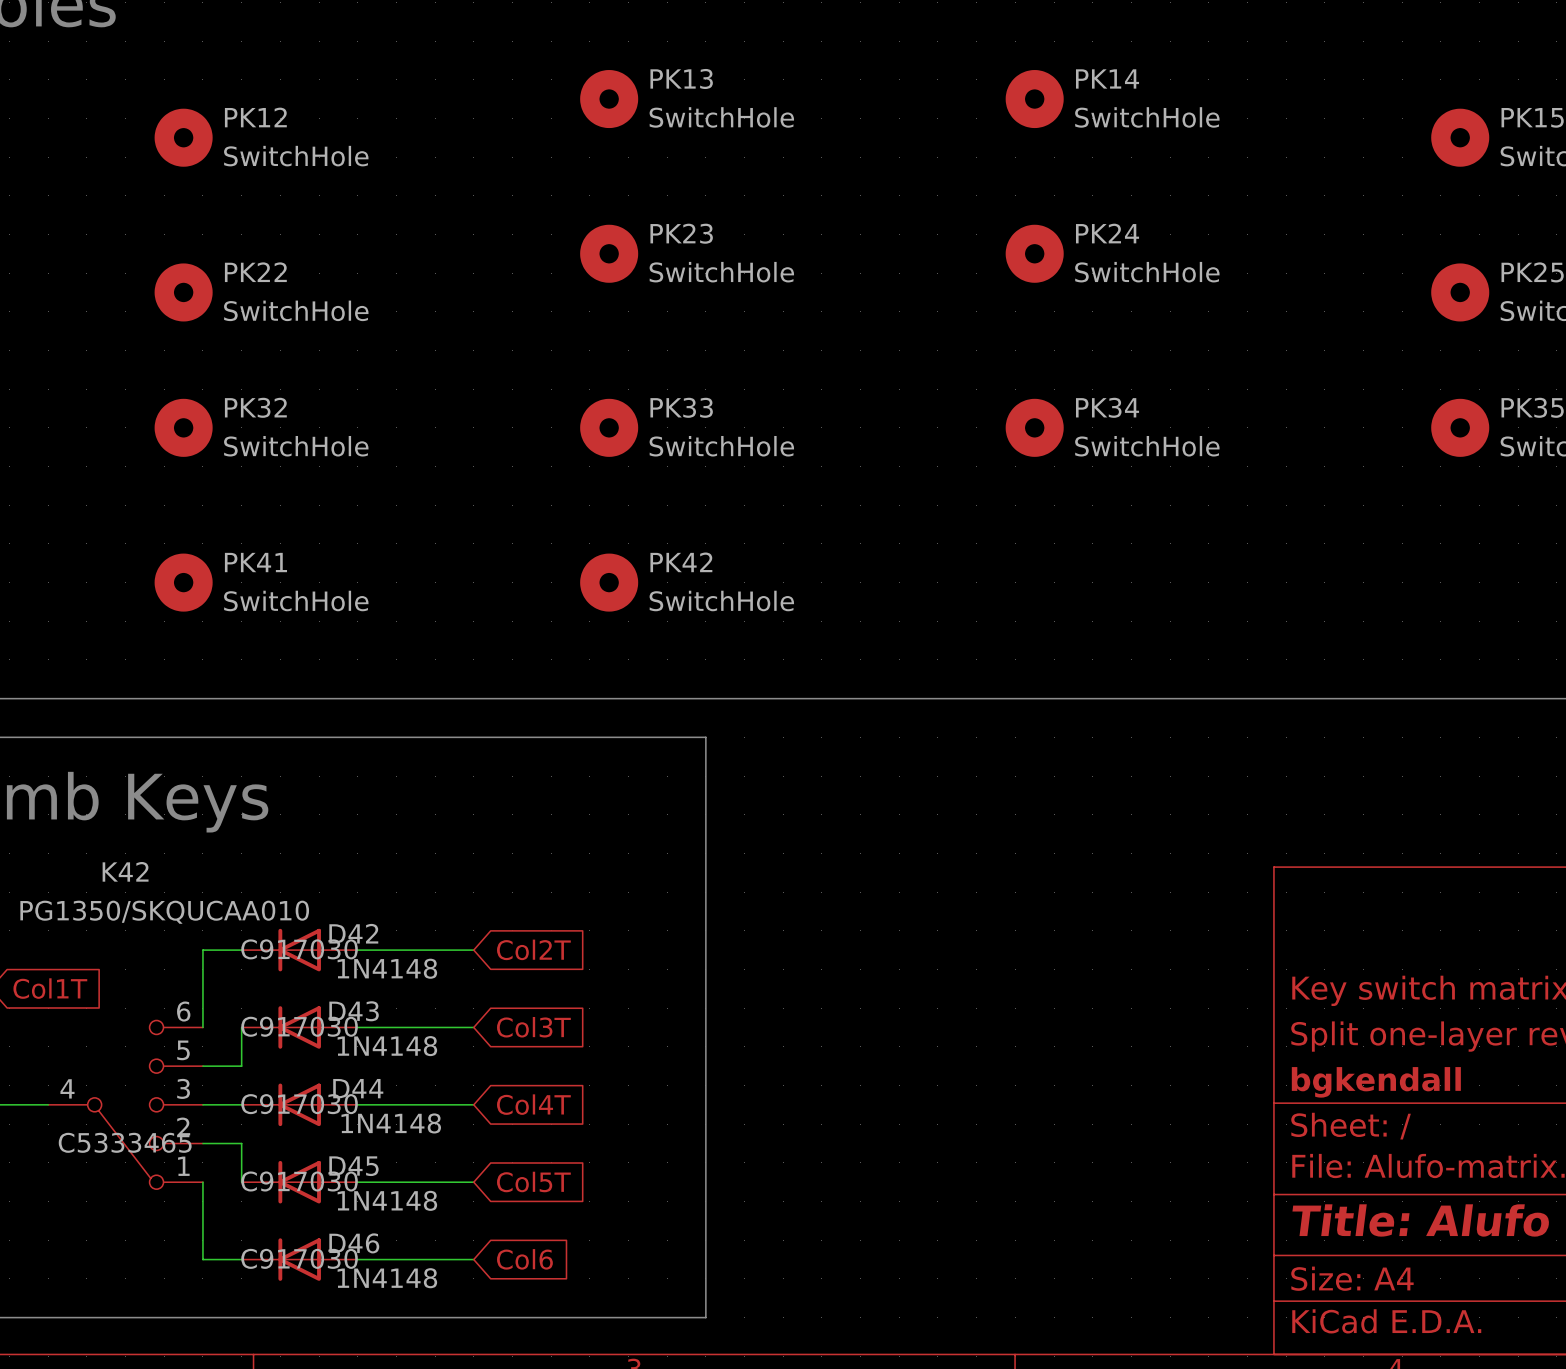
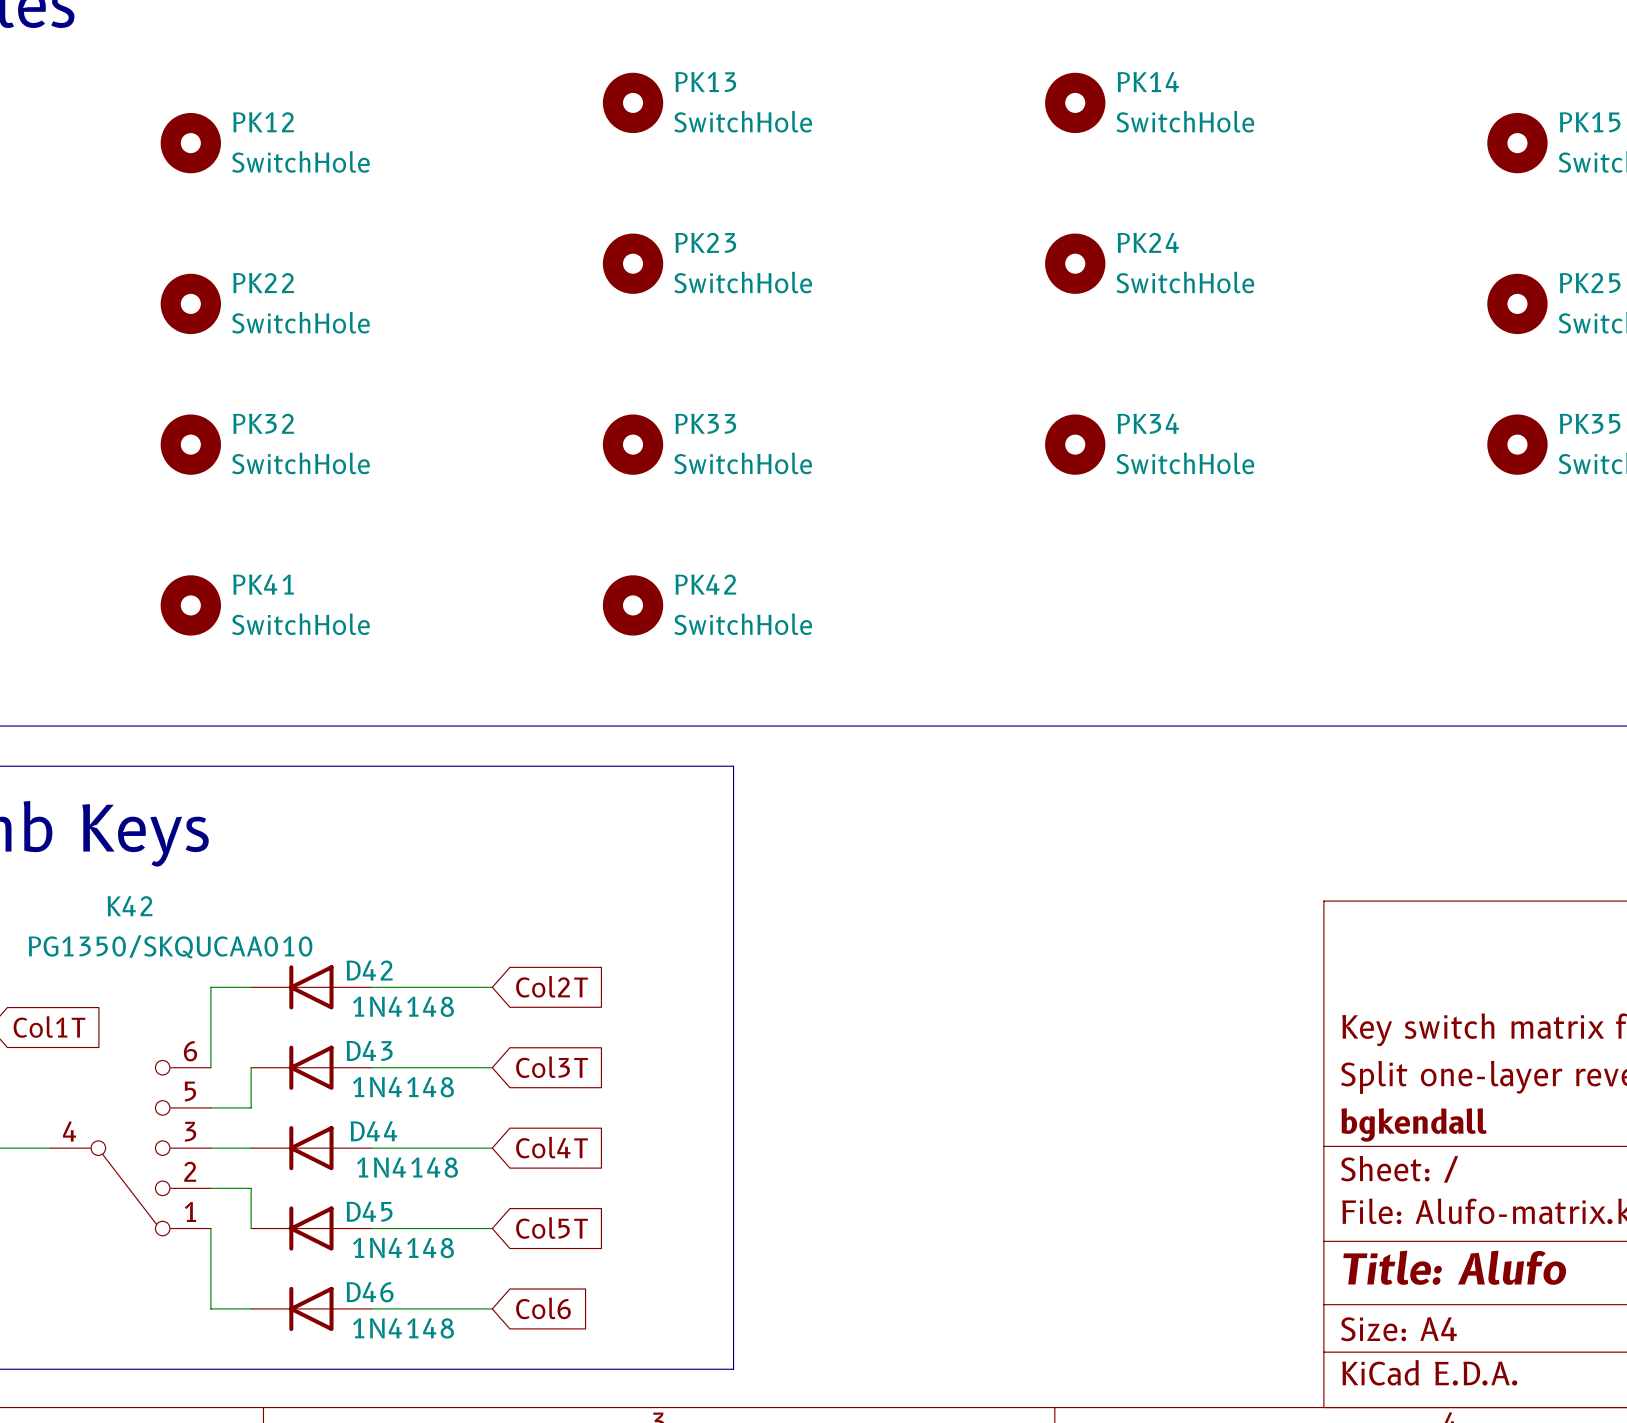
D42 text: C917030 (299, 949) -> none
D43 text: C917030 (299, 1026) -> none
D44 text: C917030 (299, 1104) -> none
K42 text: C5333465 (125, 1142) -> none
D45 text: C917030 (299, 1181) -> none
D46 text: C917030 (299, 1258) -> none

